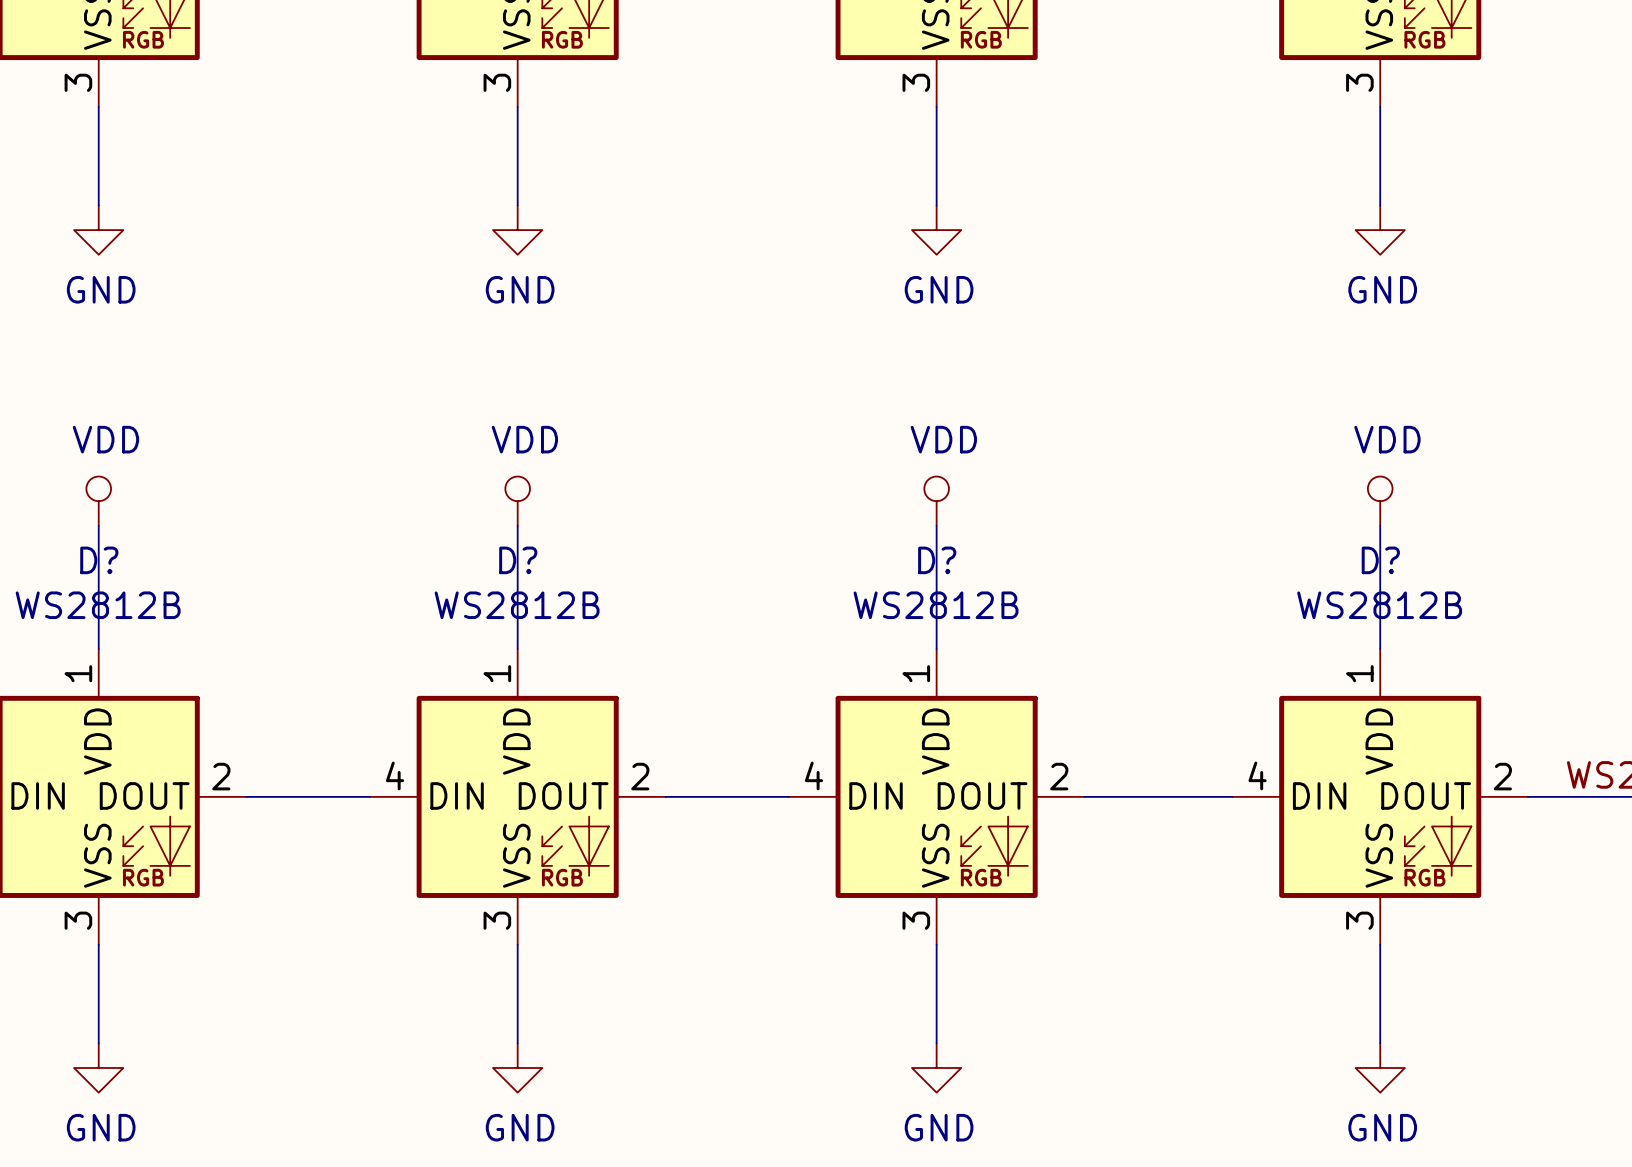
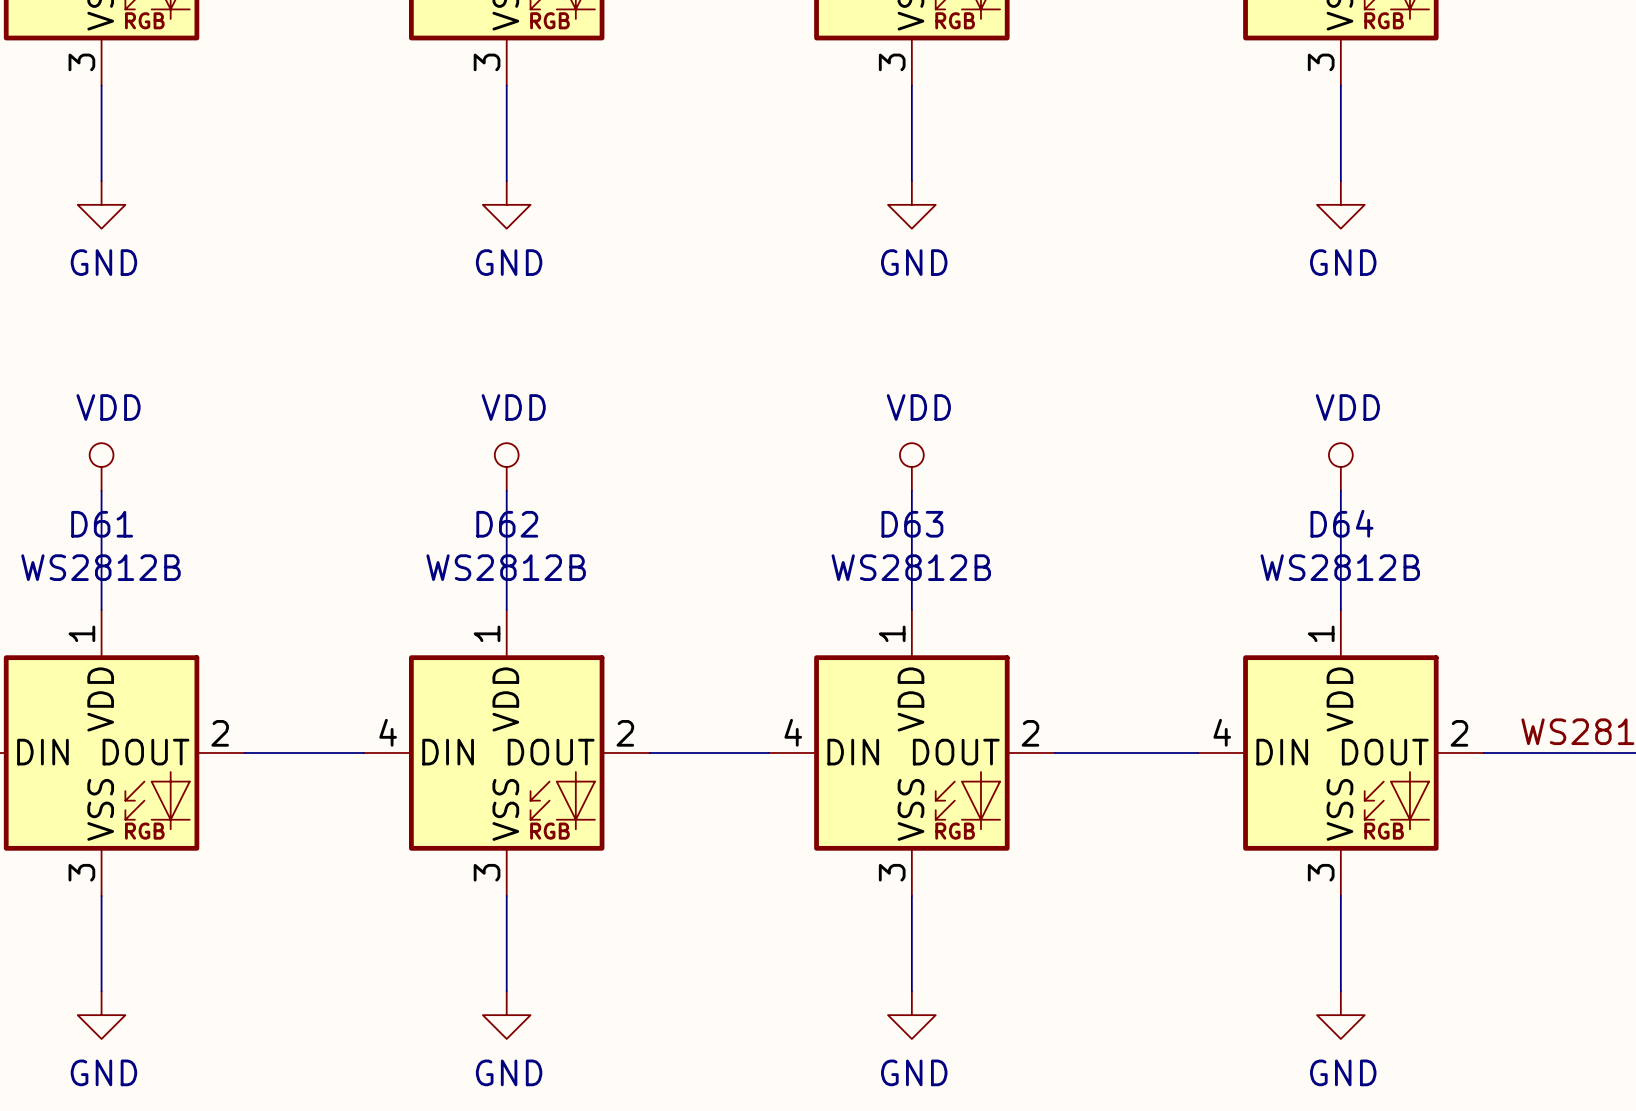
D? name: D? (99, 560) -> D61 (102, 524)
D? name: D? (518, 560) -> D62 (507, 524)
D? name: D? (937, 560) -> D63 (912, 524)
D? name: D? (1380, 560) -> D64 (1341, 523)

